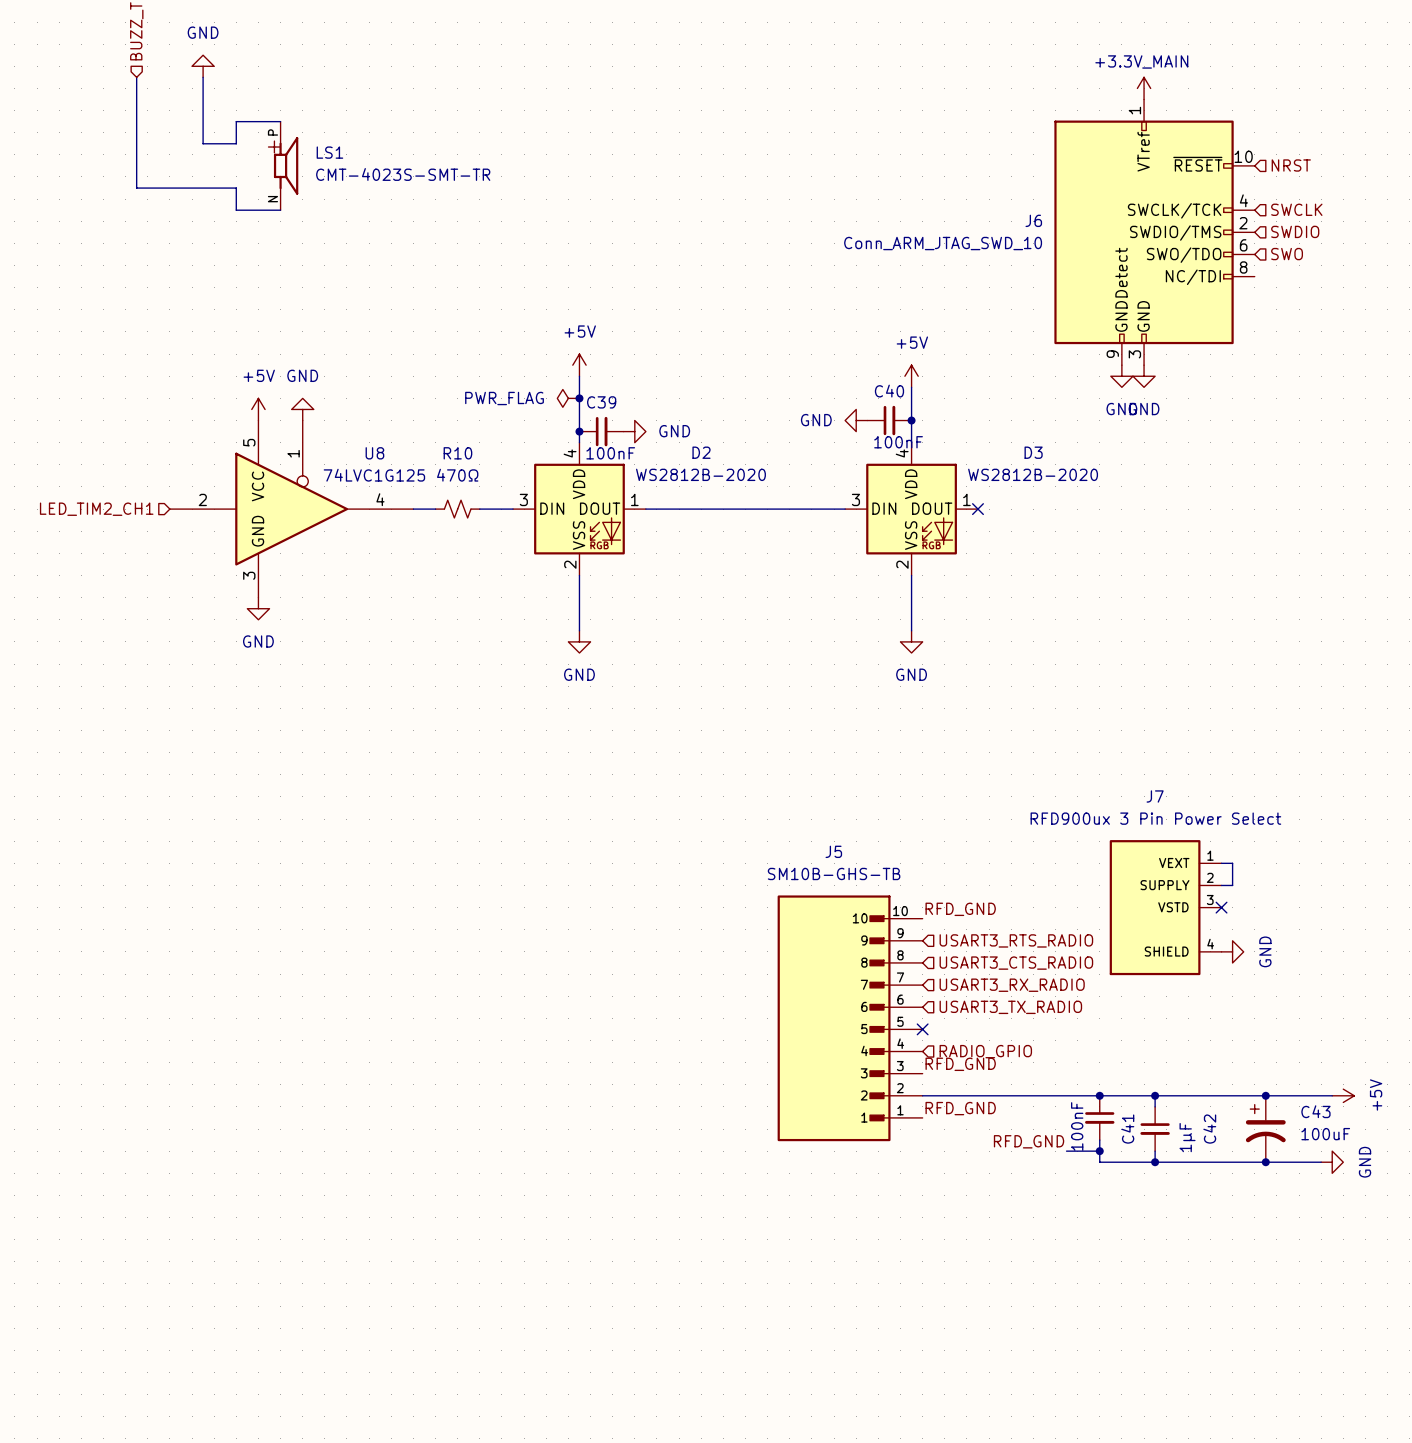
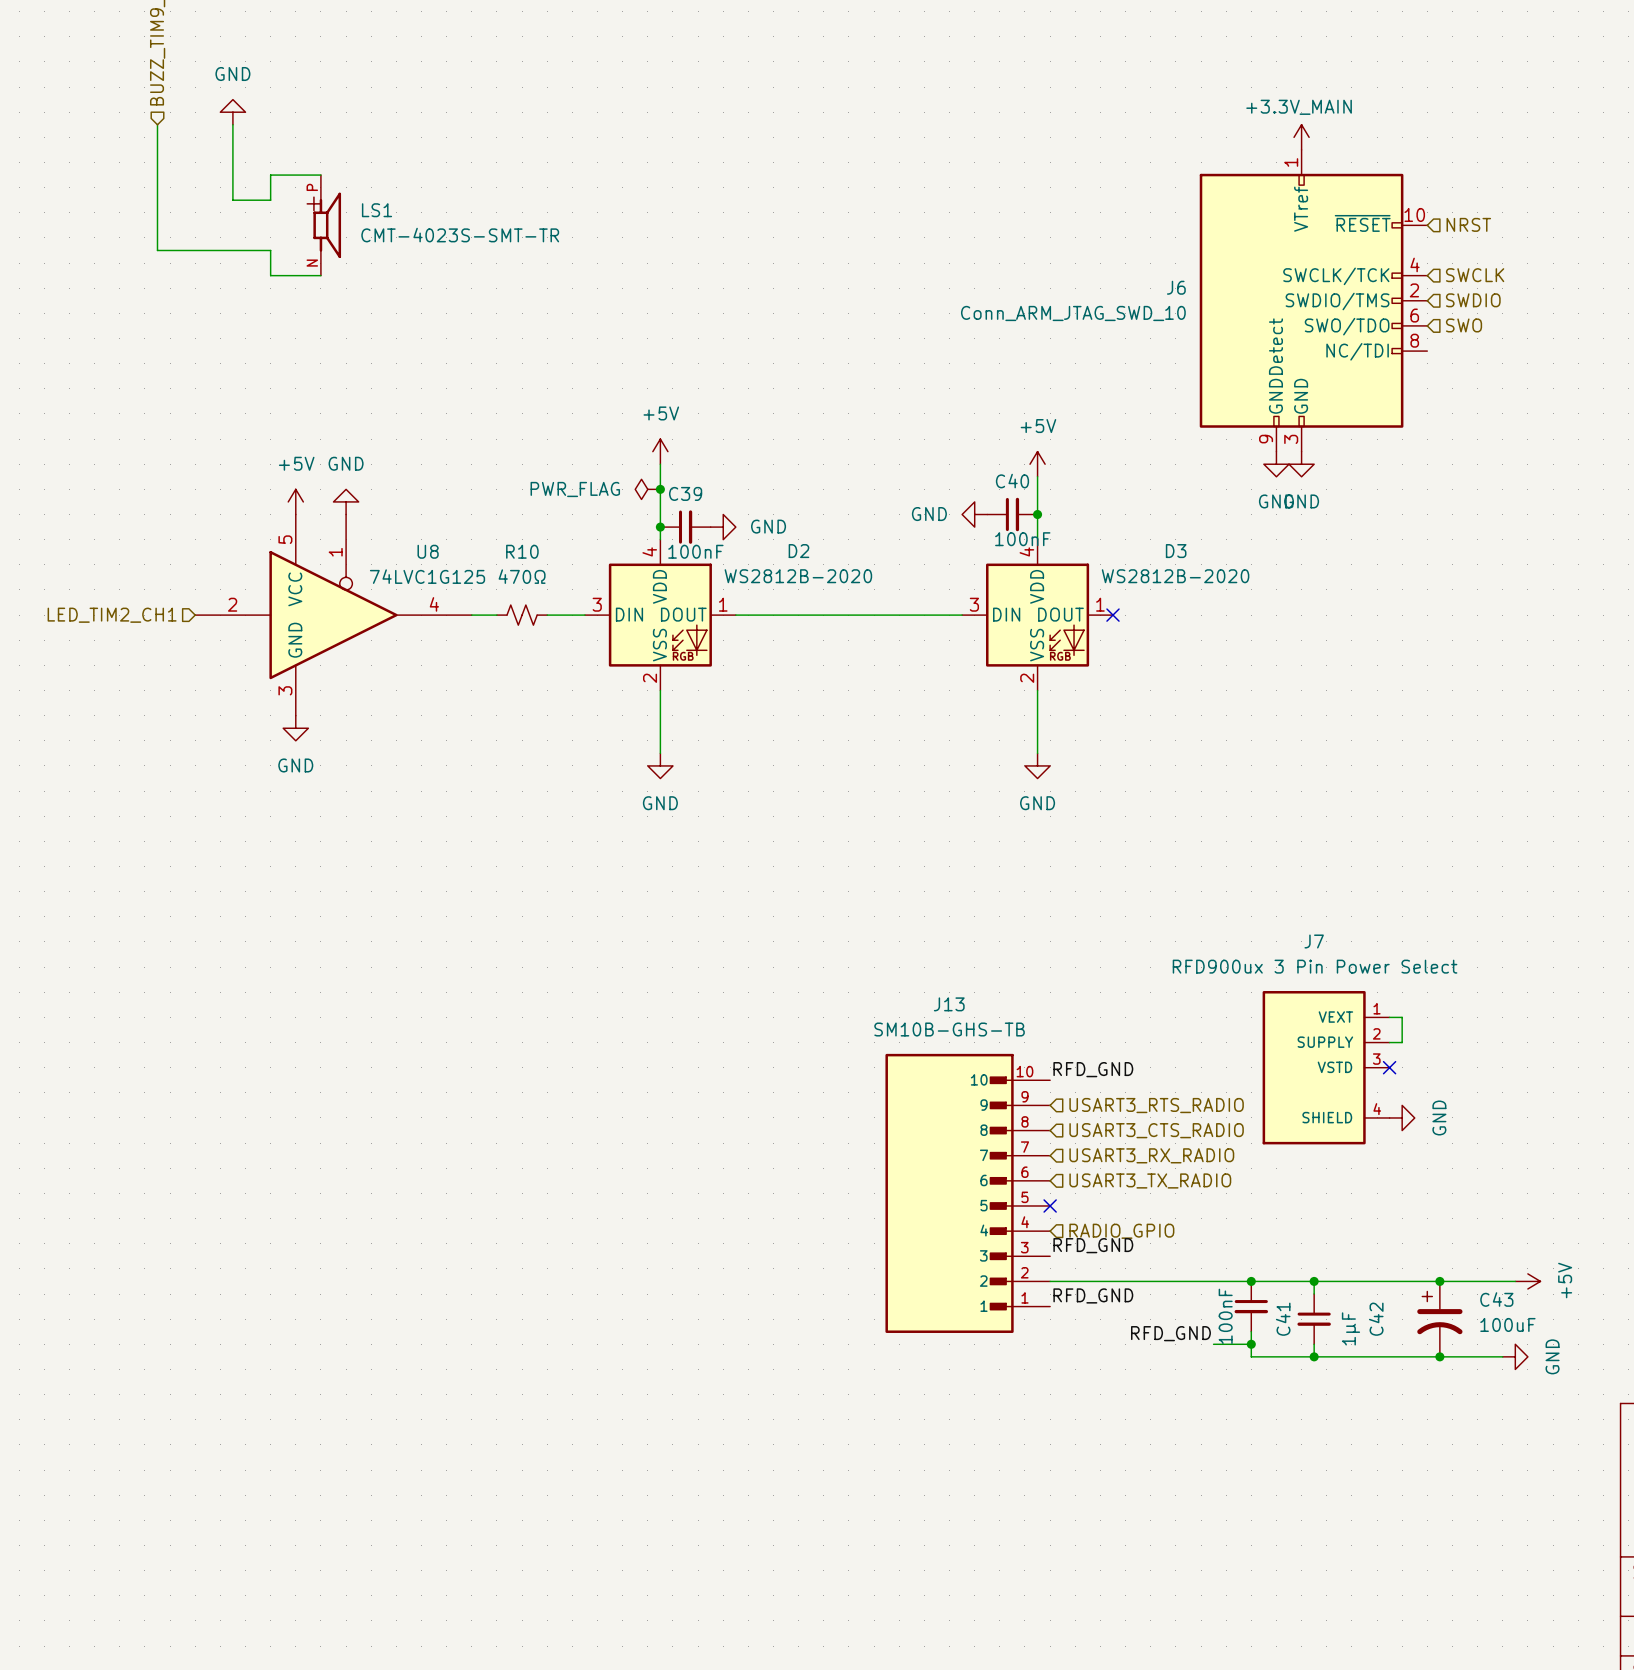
J5 name: J5 (833, 851) -> J13 (949, 1004)

